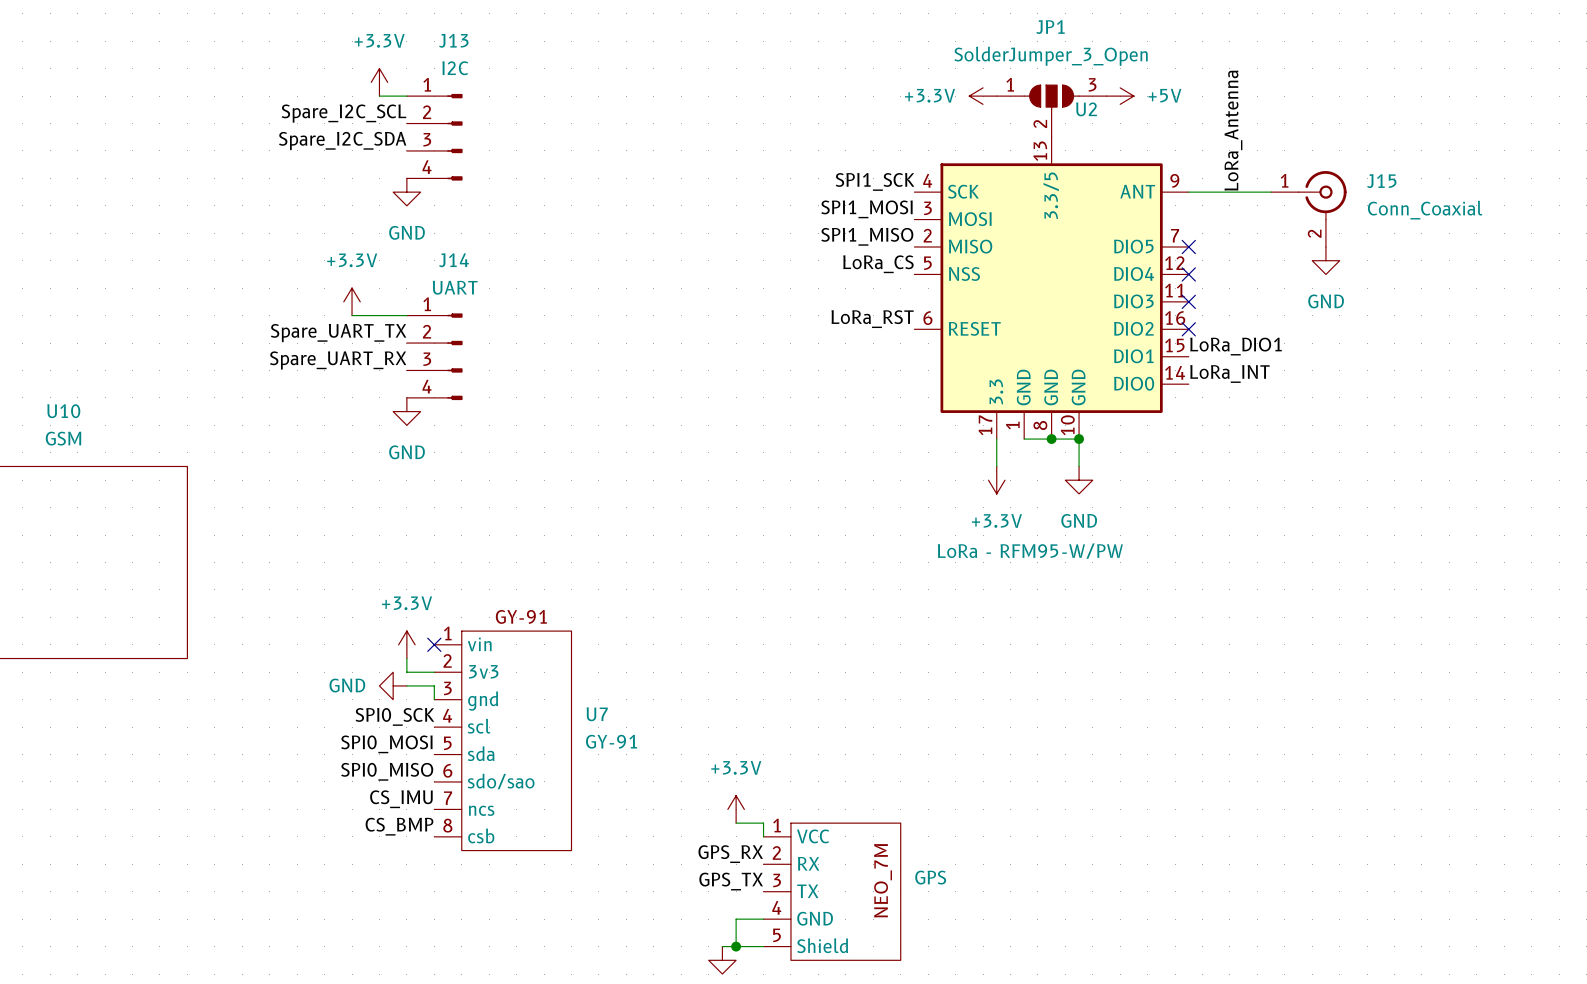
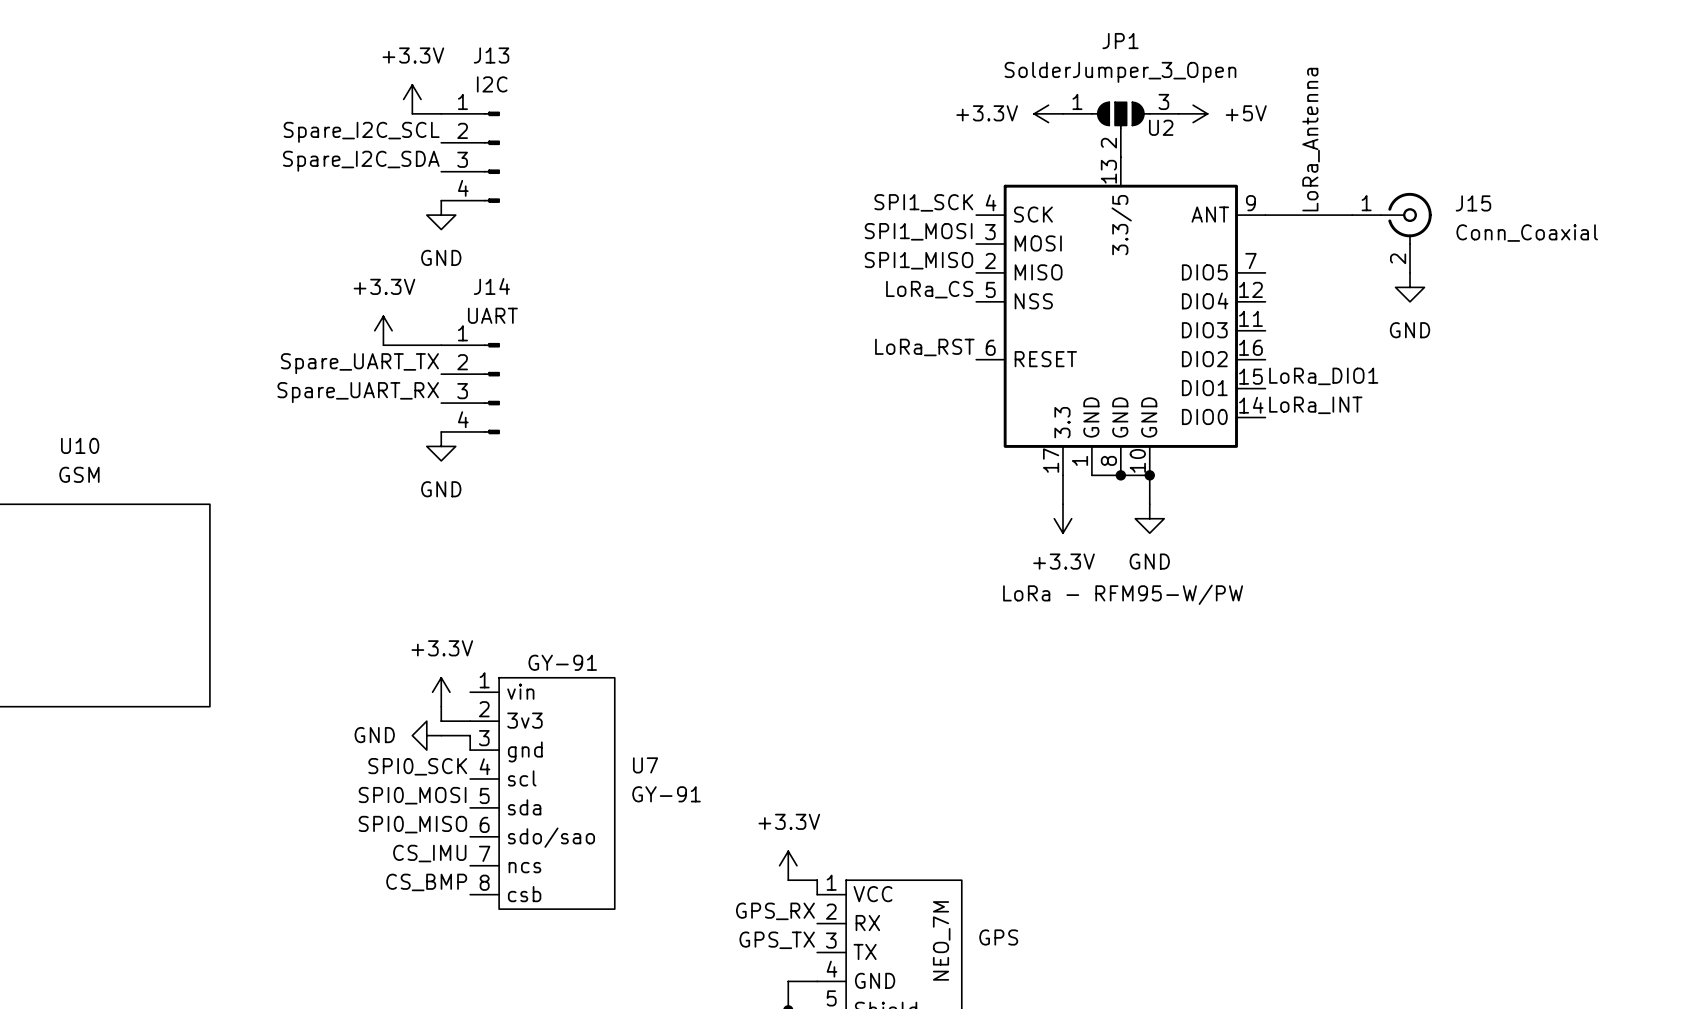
no-connect mark: (1188, 247) -> none
no-connect mark: (1188, 274) -> none
no-connect mark: (1188, 301) -> none
no-connect mark: (1188, 329) -> none
no-connect mark: (434, 644) -> none

